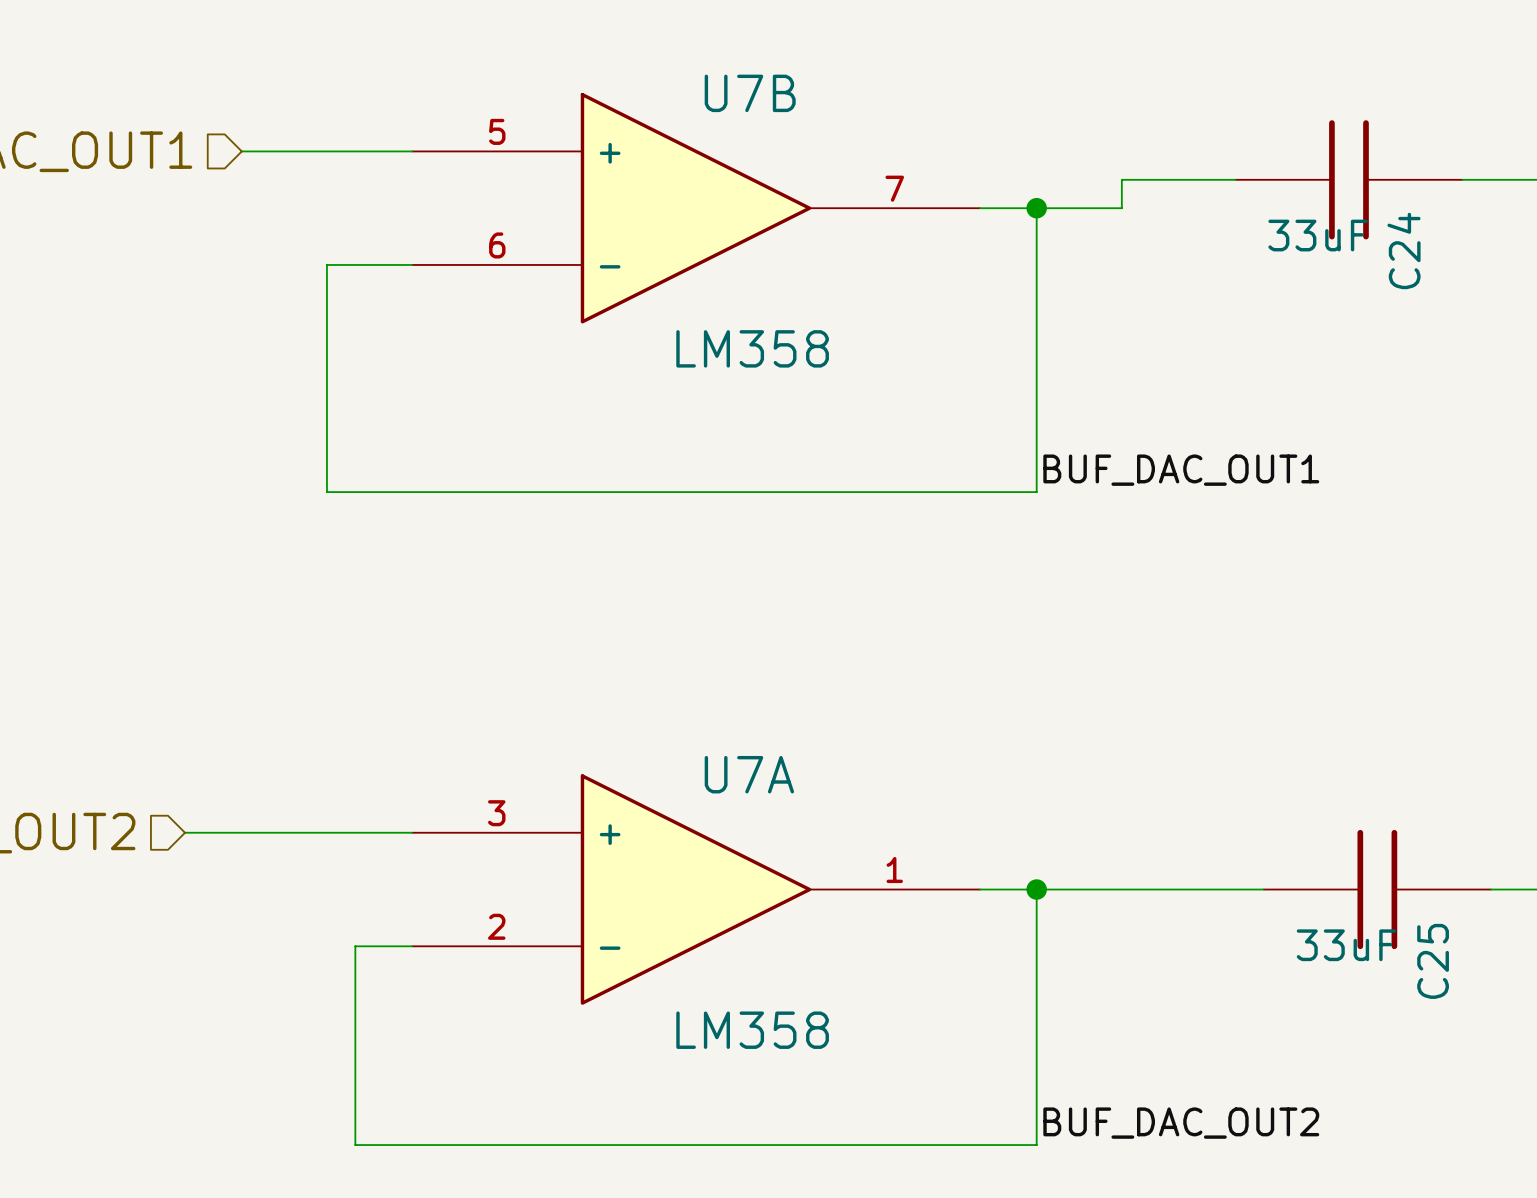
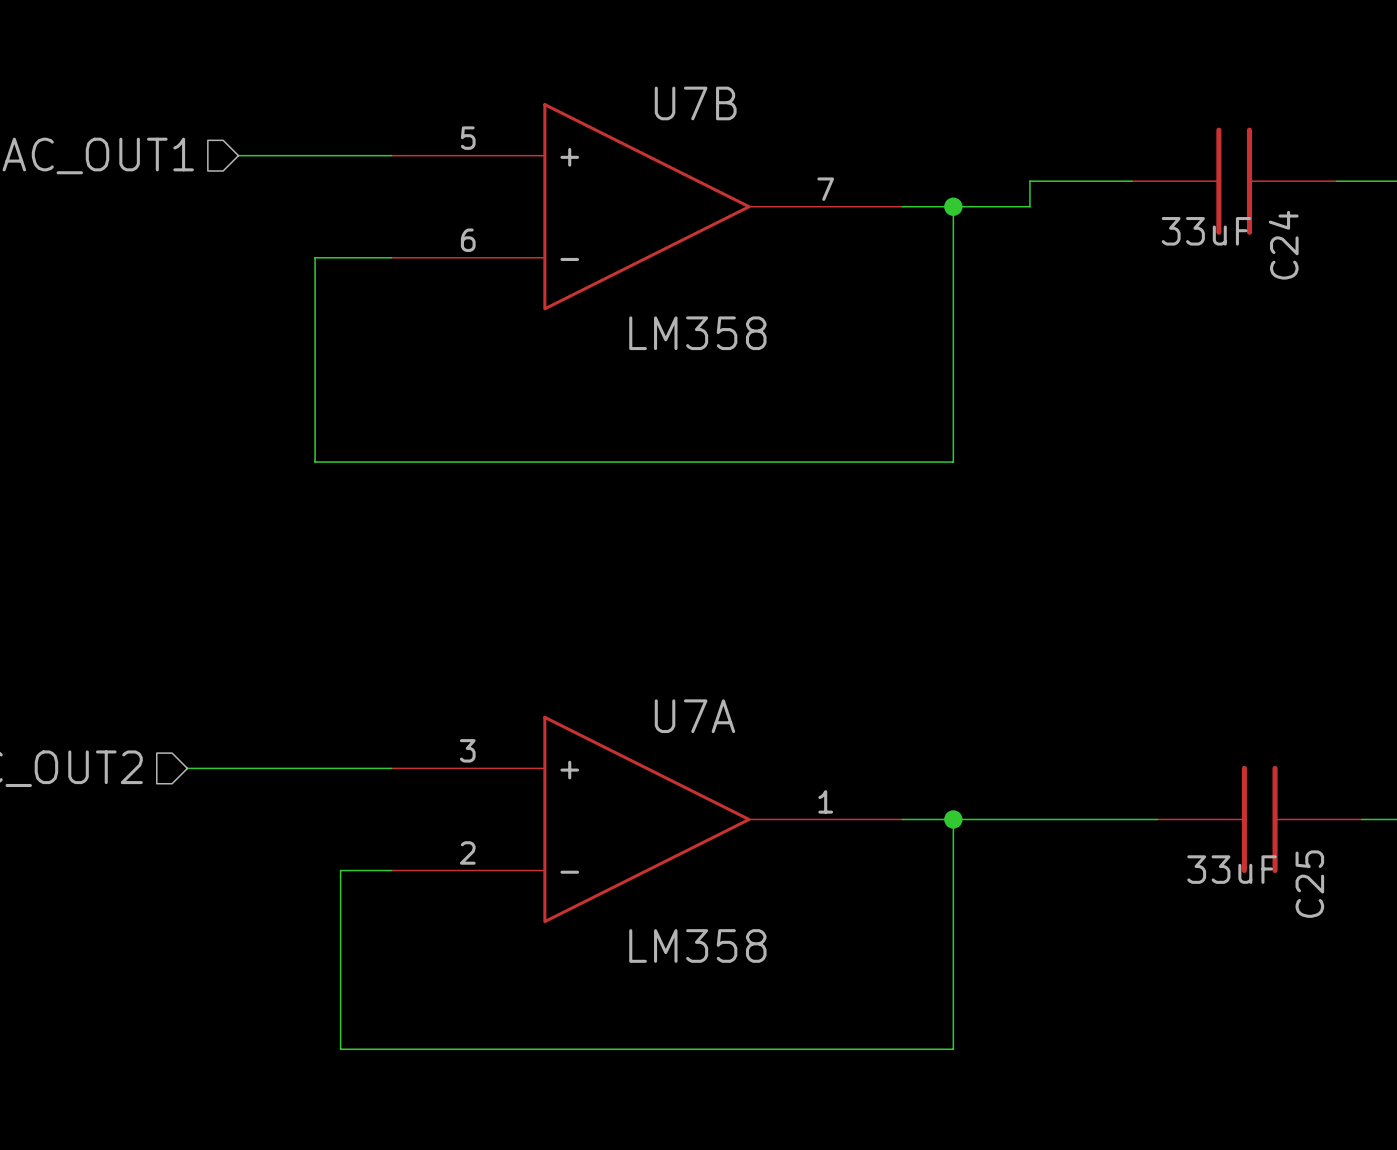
label: BUF_DAC_OUT1 (1181, 470) -> none
label: BUF_DAC_OUT2 (1181, 1123) -> none

